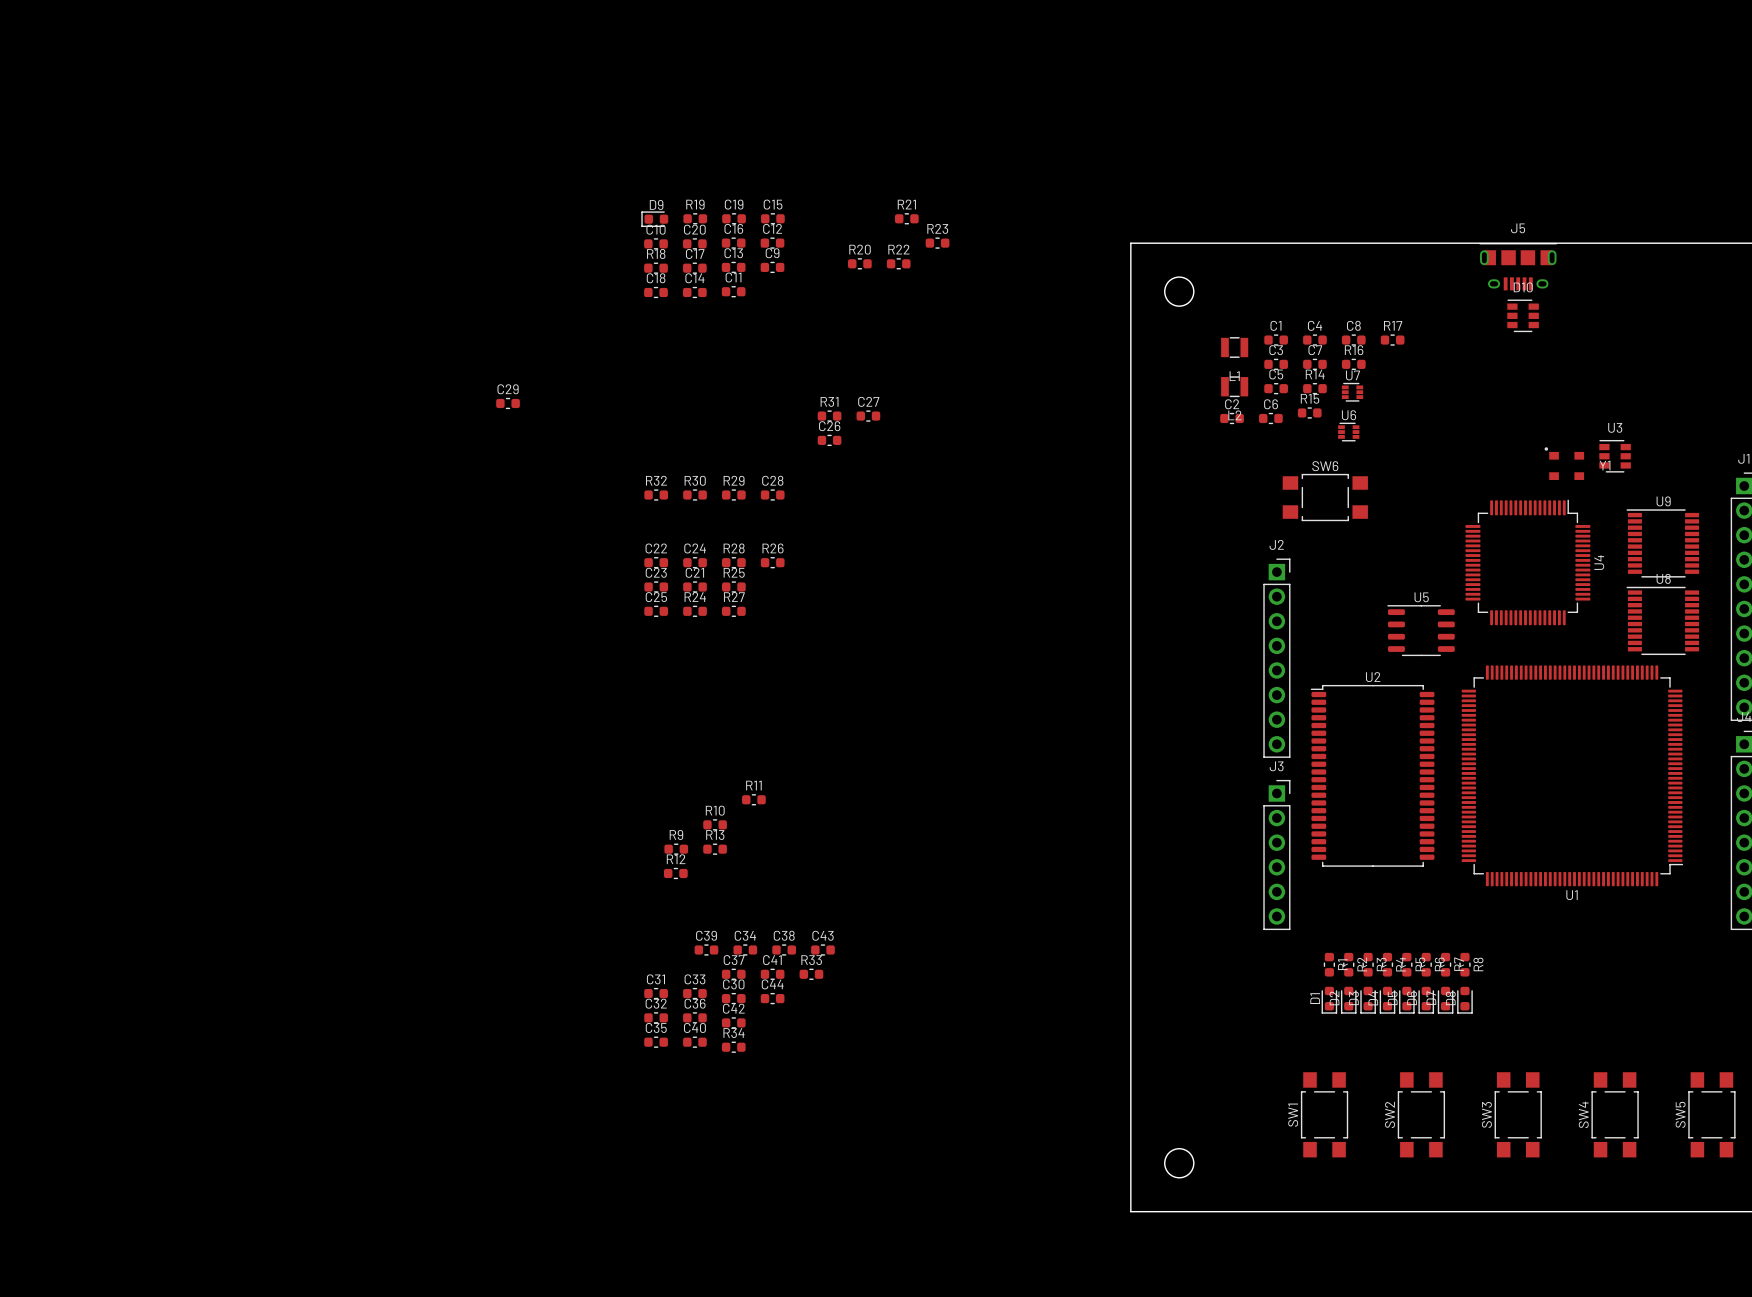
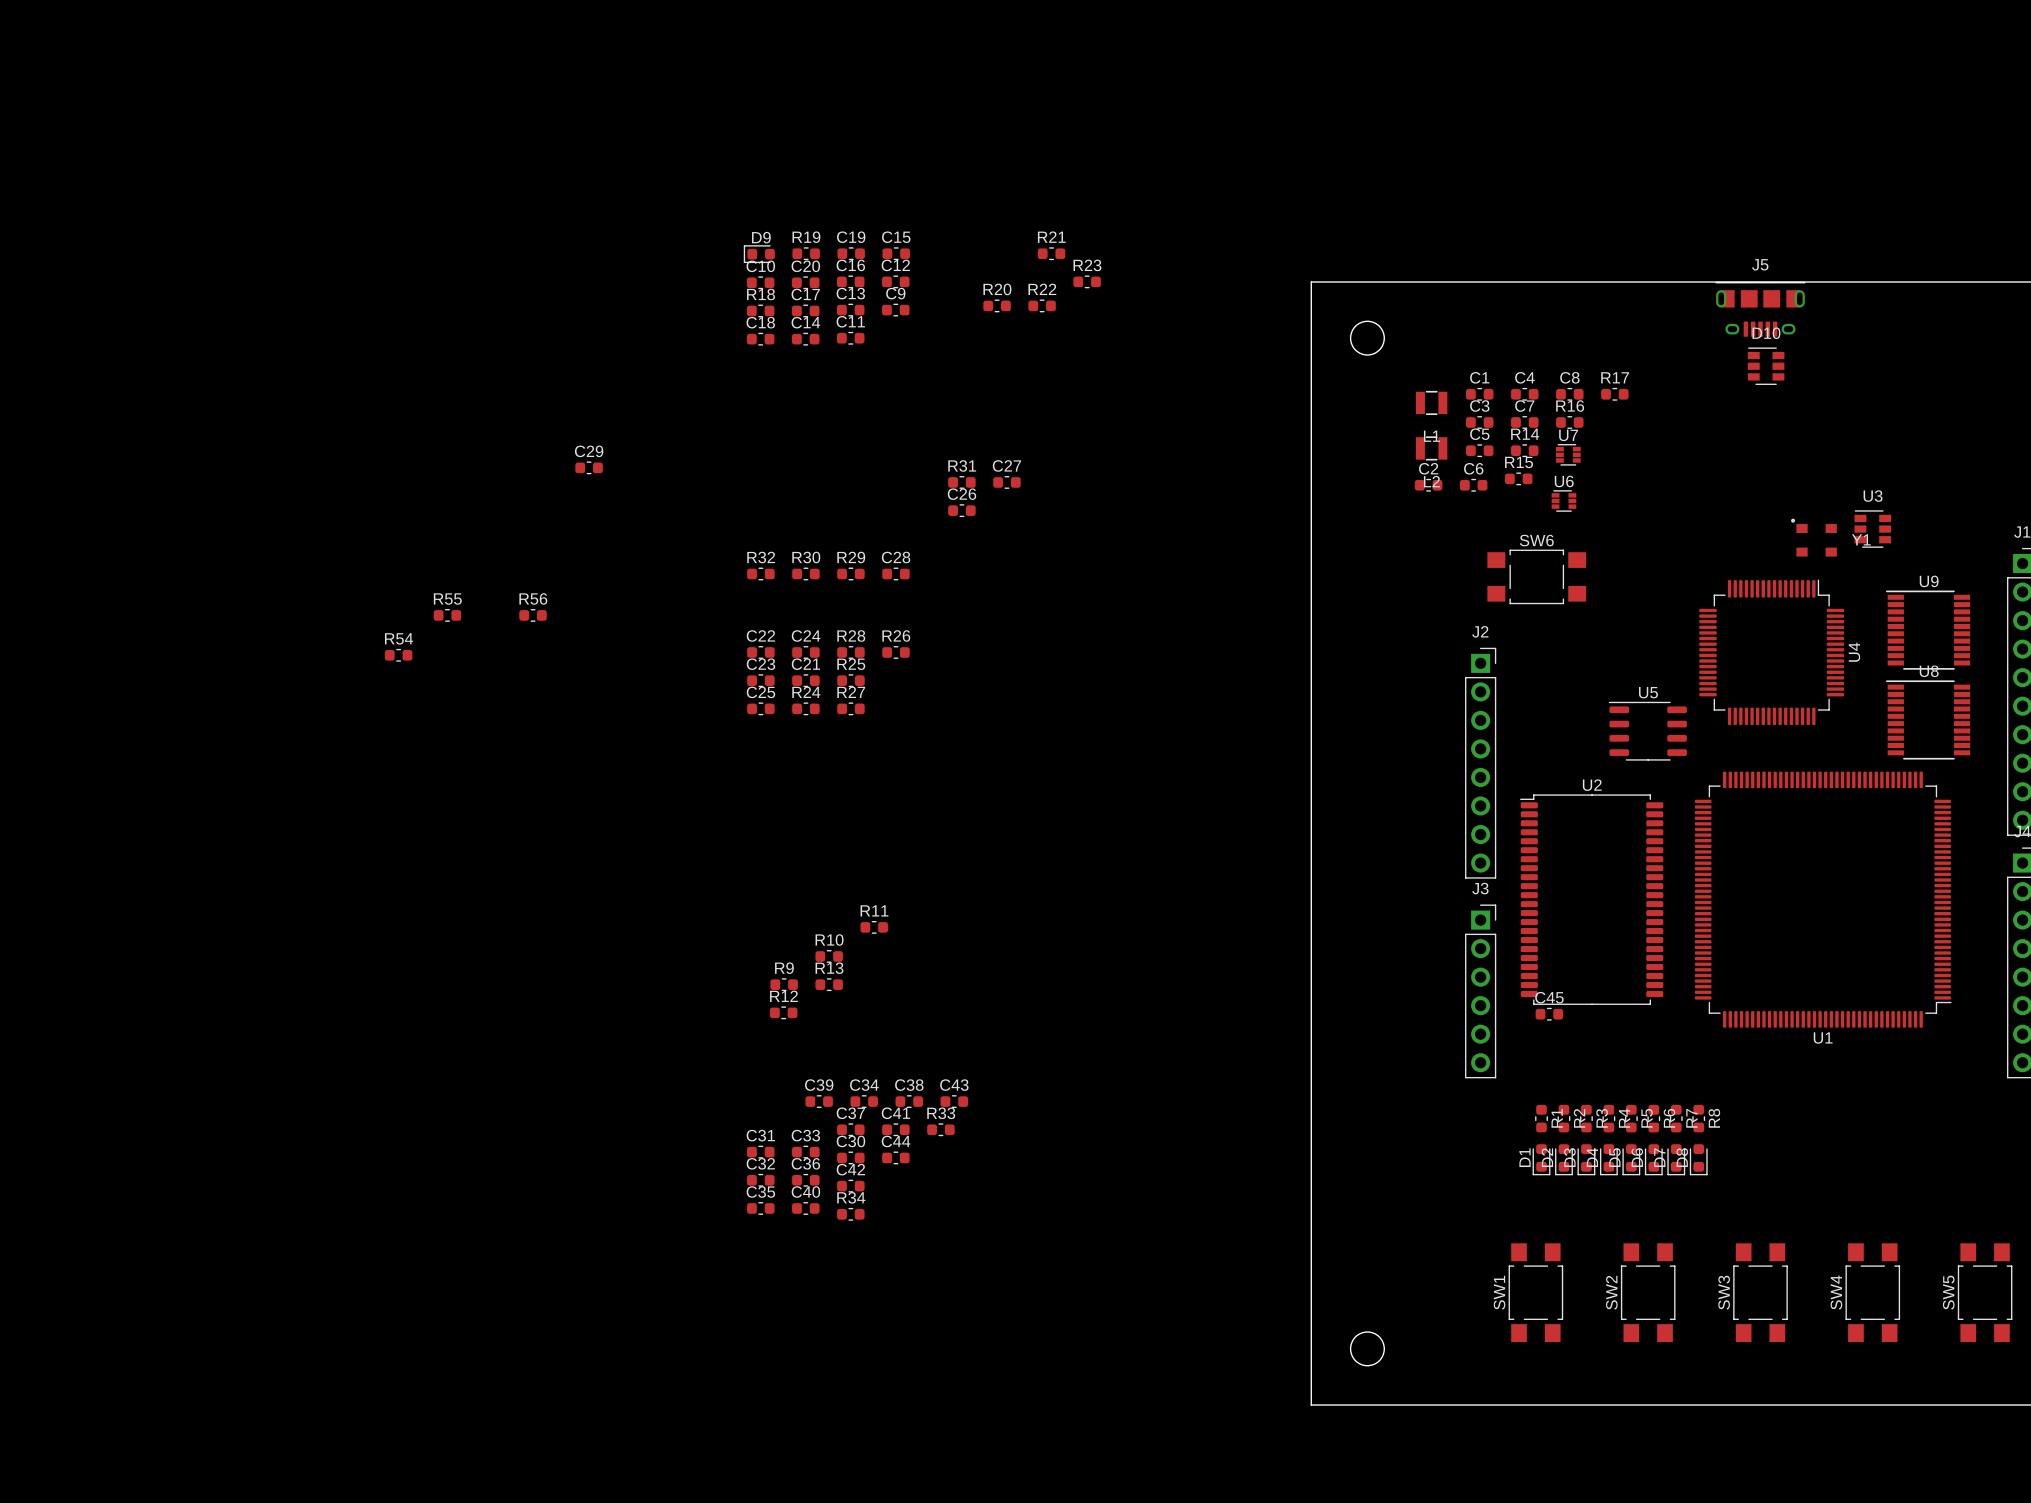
R55: none -> (447, 615)
R56: none -> (533, 615)
R54: none -> (398, 655)
C45: none -> (1549, 1014)

